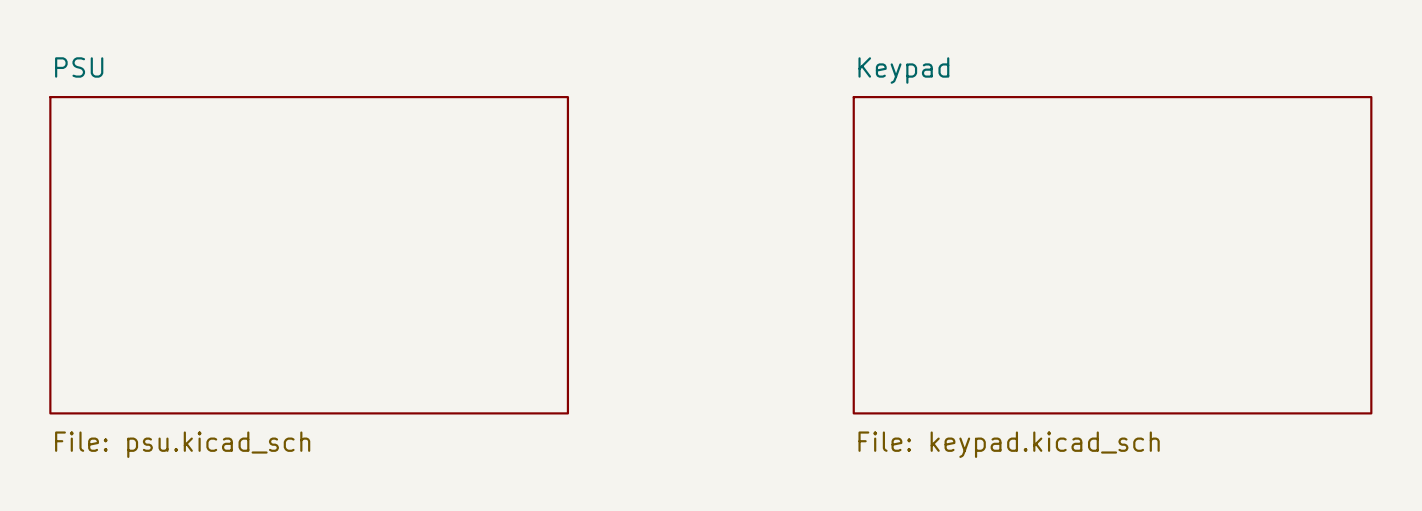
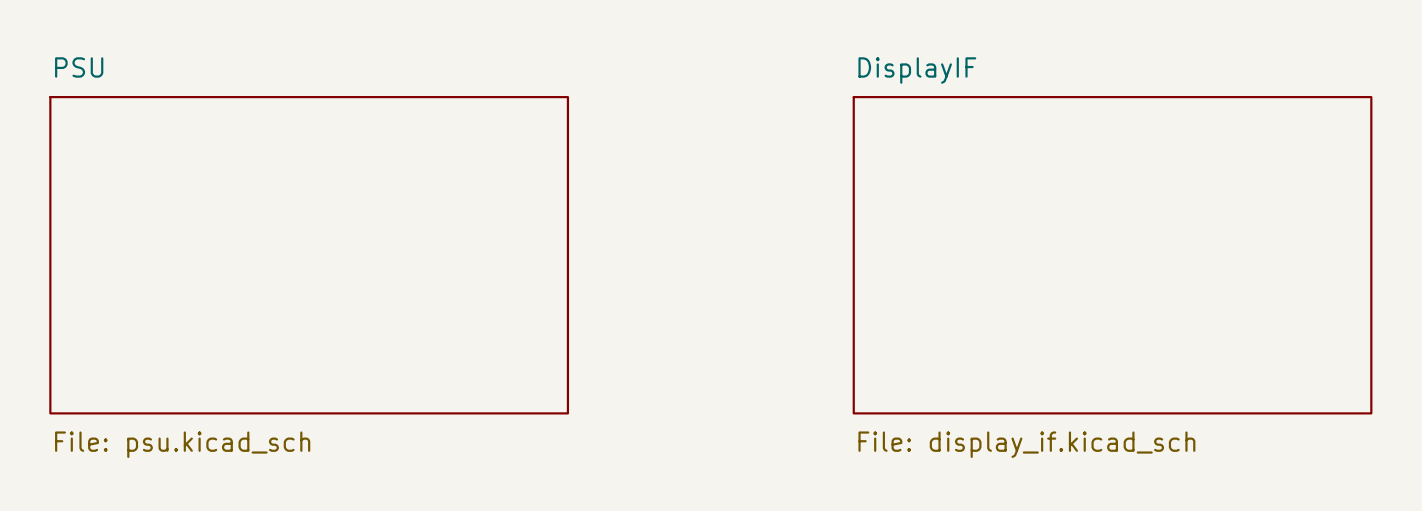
sheet Keypad name: Keypad (903, 70) -> DisplayIF (917, 70)
sheet Keypad value: File: keypad.kicad_sch (1009, 444) -> File: display_if.kicad_sch (1026, 444)

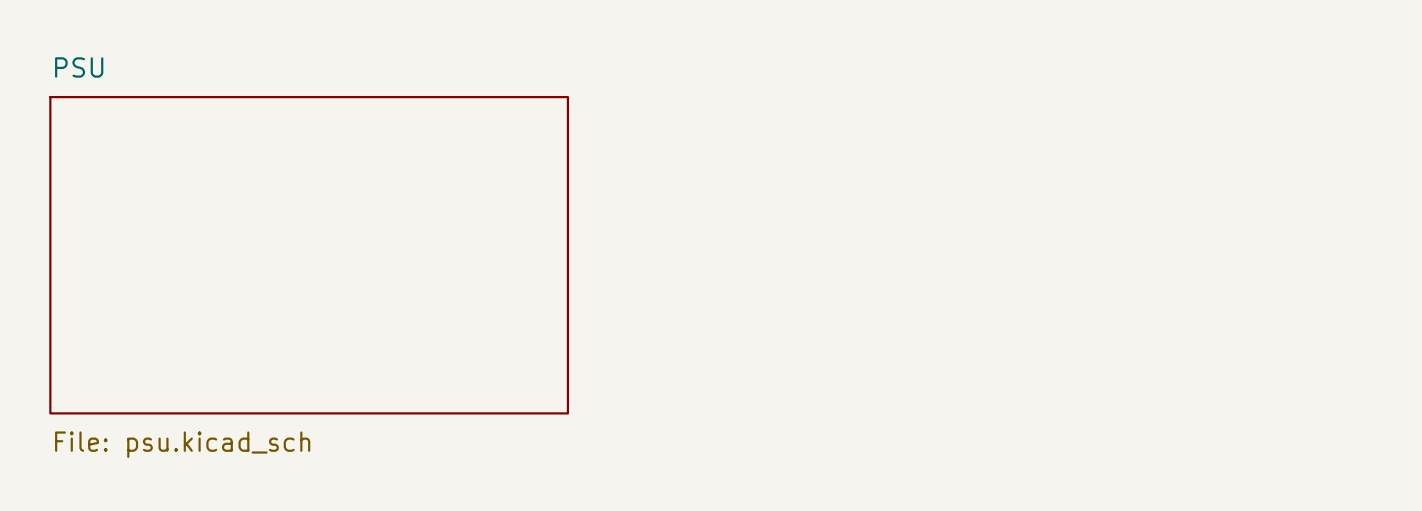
sheet DisplayIF: File: display_if.kicad_sch (1112, 255) -> none

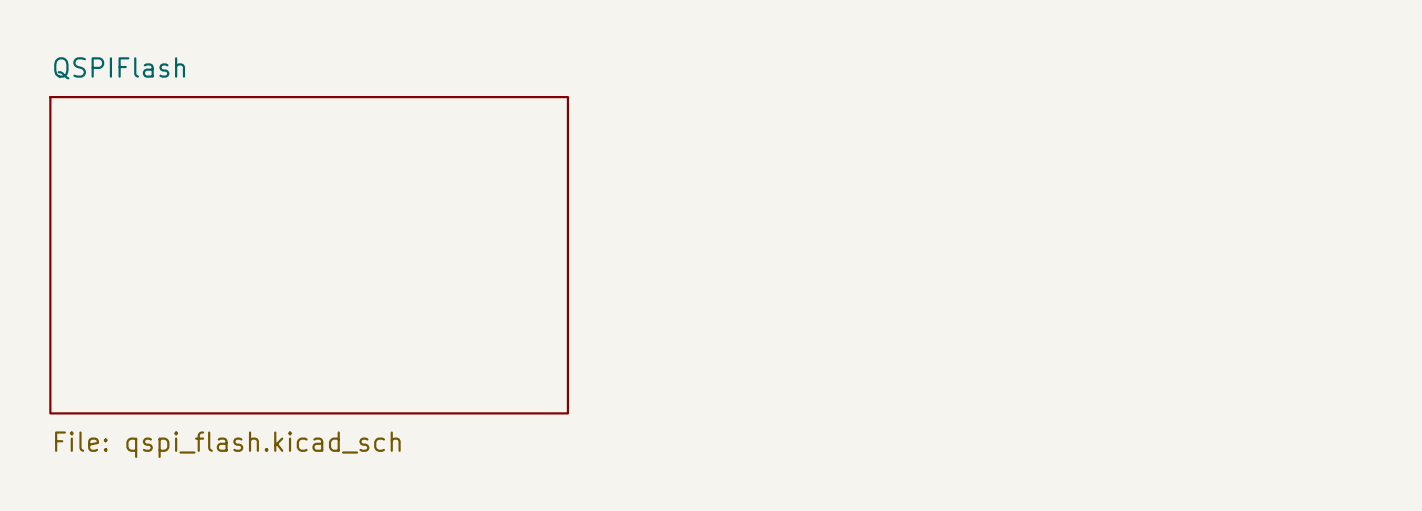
sheet PSU name: PSU (79, 67) -> QSPIFlash (119, 68)
sheet PSU value: File: psu.kicad_sch (182, 444) -> File: qspi_flash.kicad_sch (227, 444)

